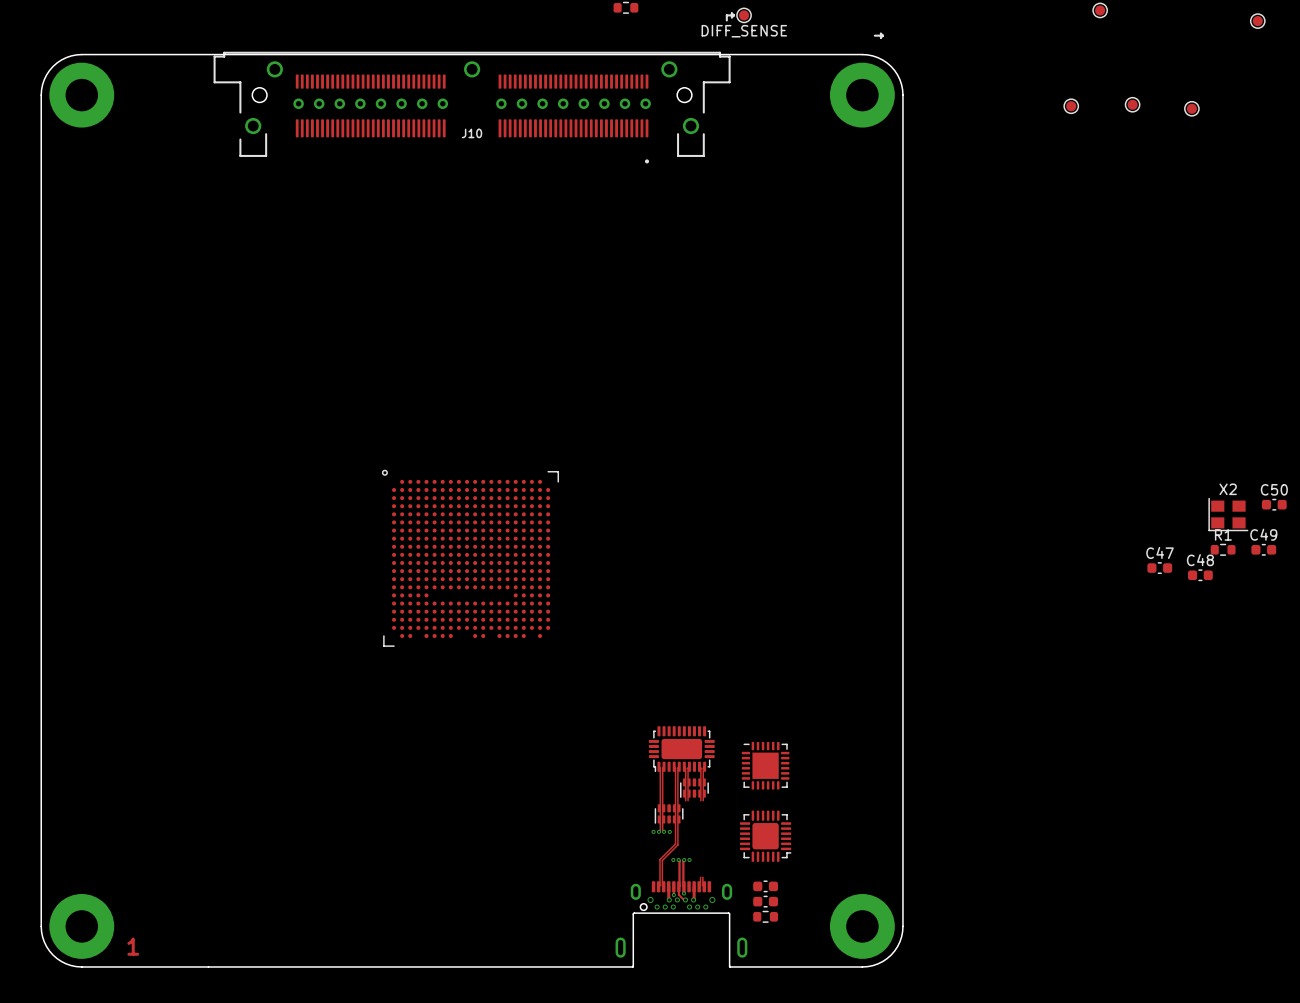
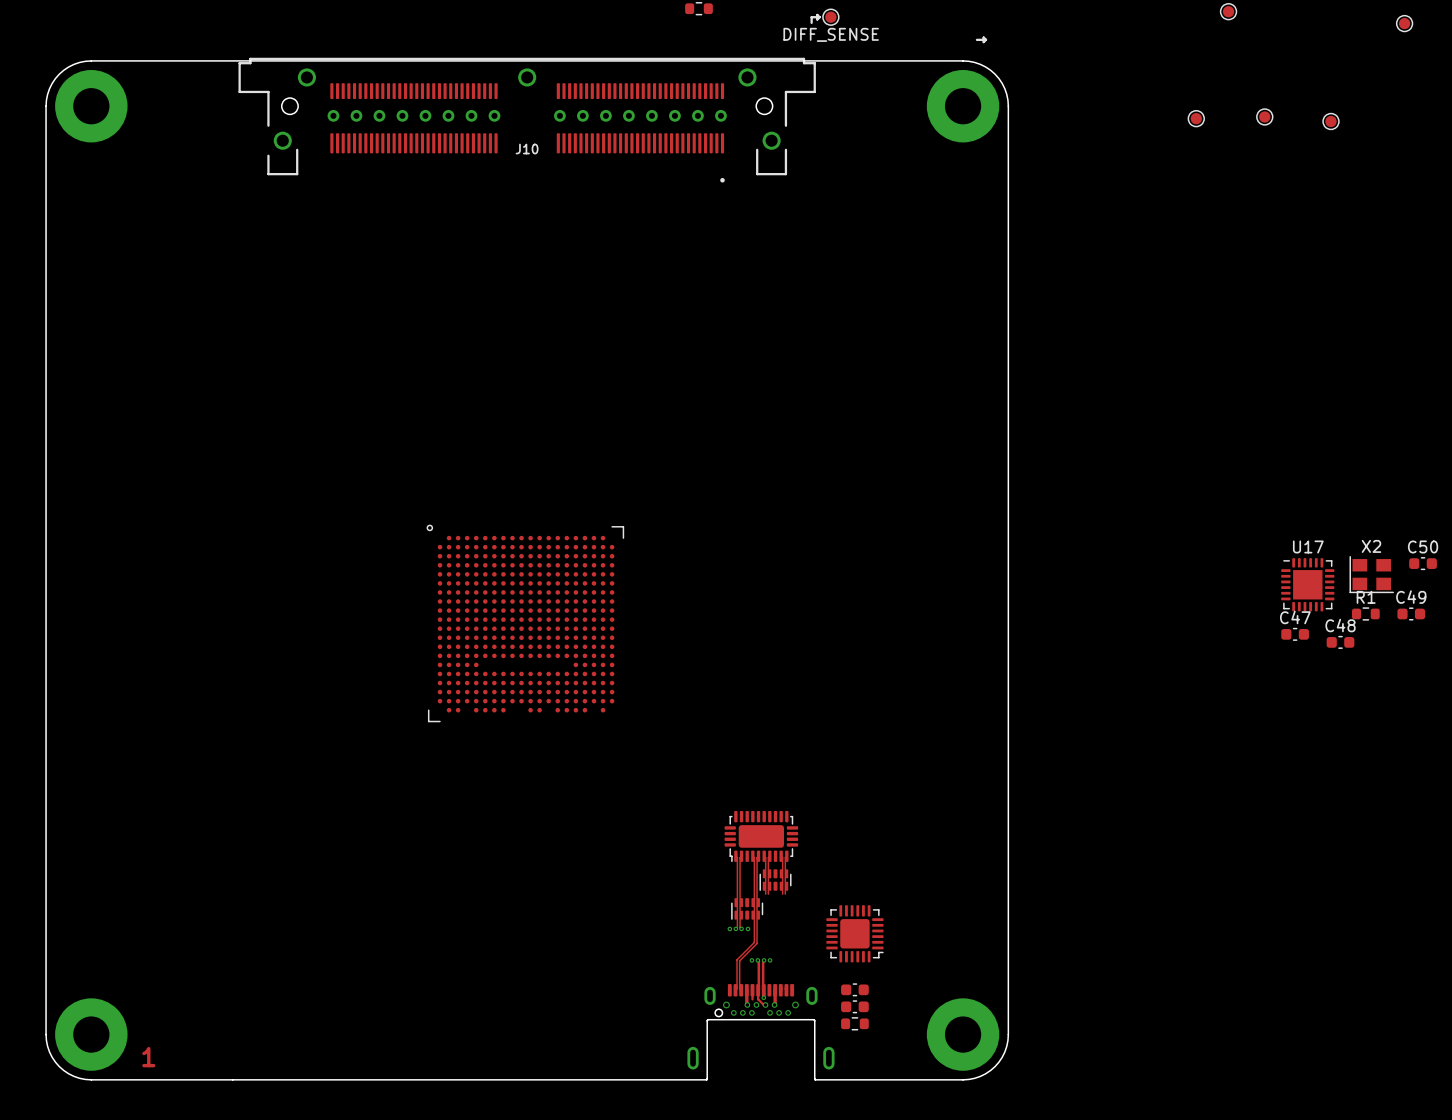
U17: none -> (1307, 584)
part: (765, 765) -> none
track: (700, 877) (700, 885) -> none
track: (702, 877) (702, 885) -> none
via: (673, 895) -> none

